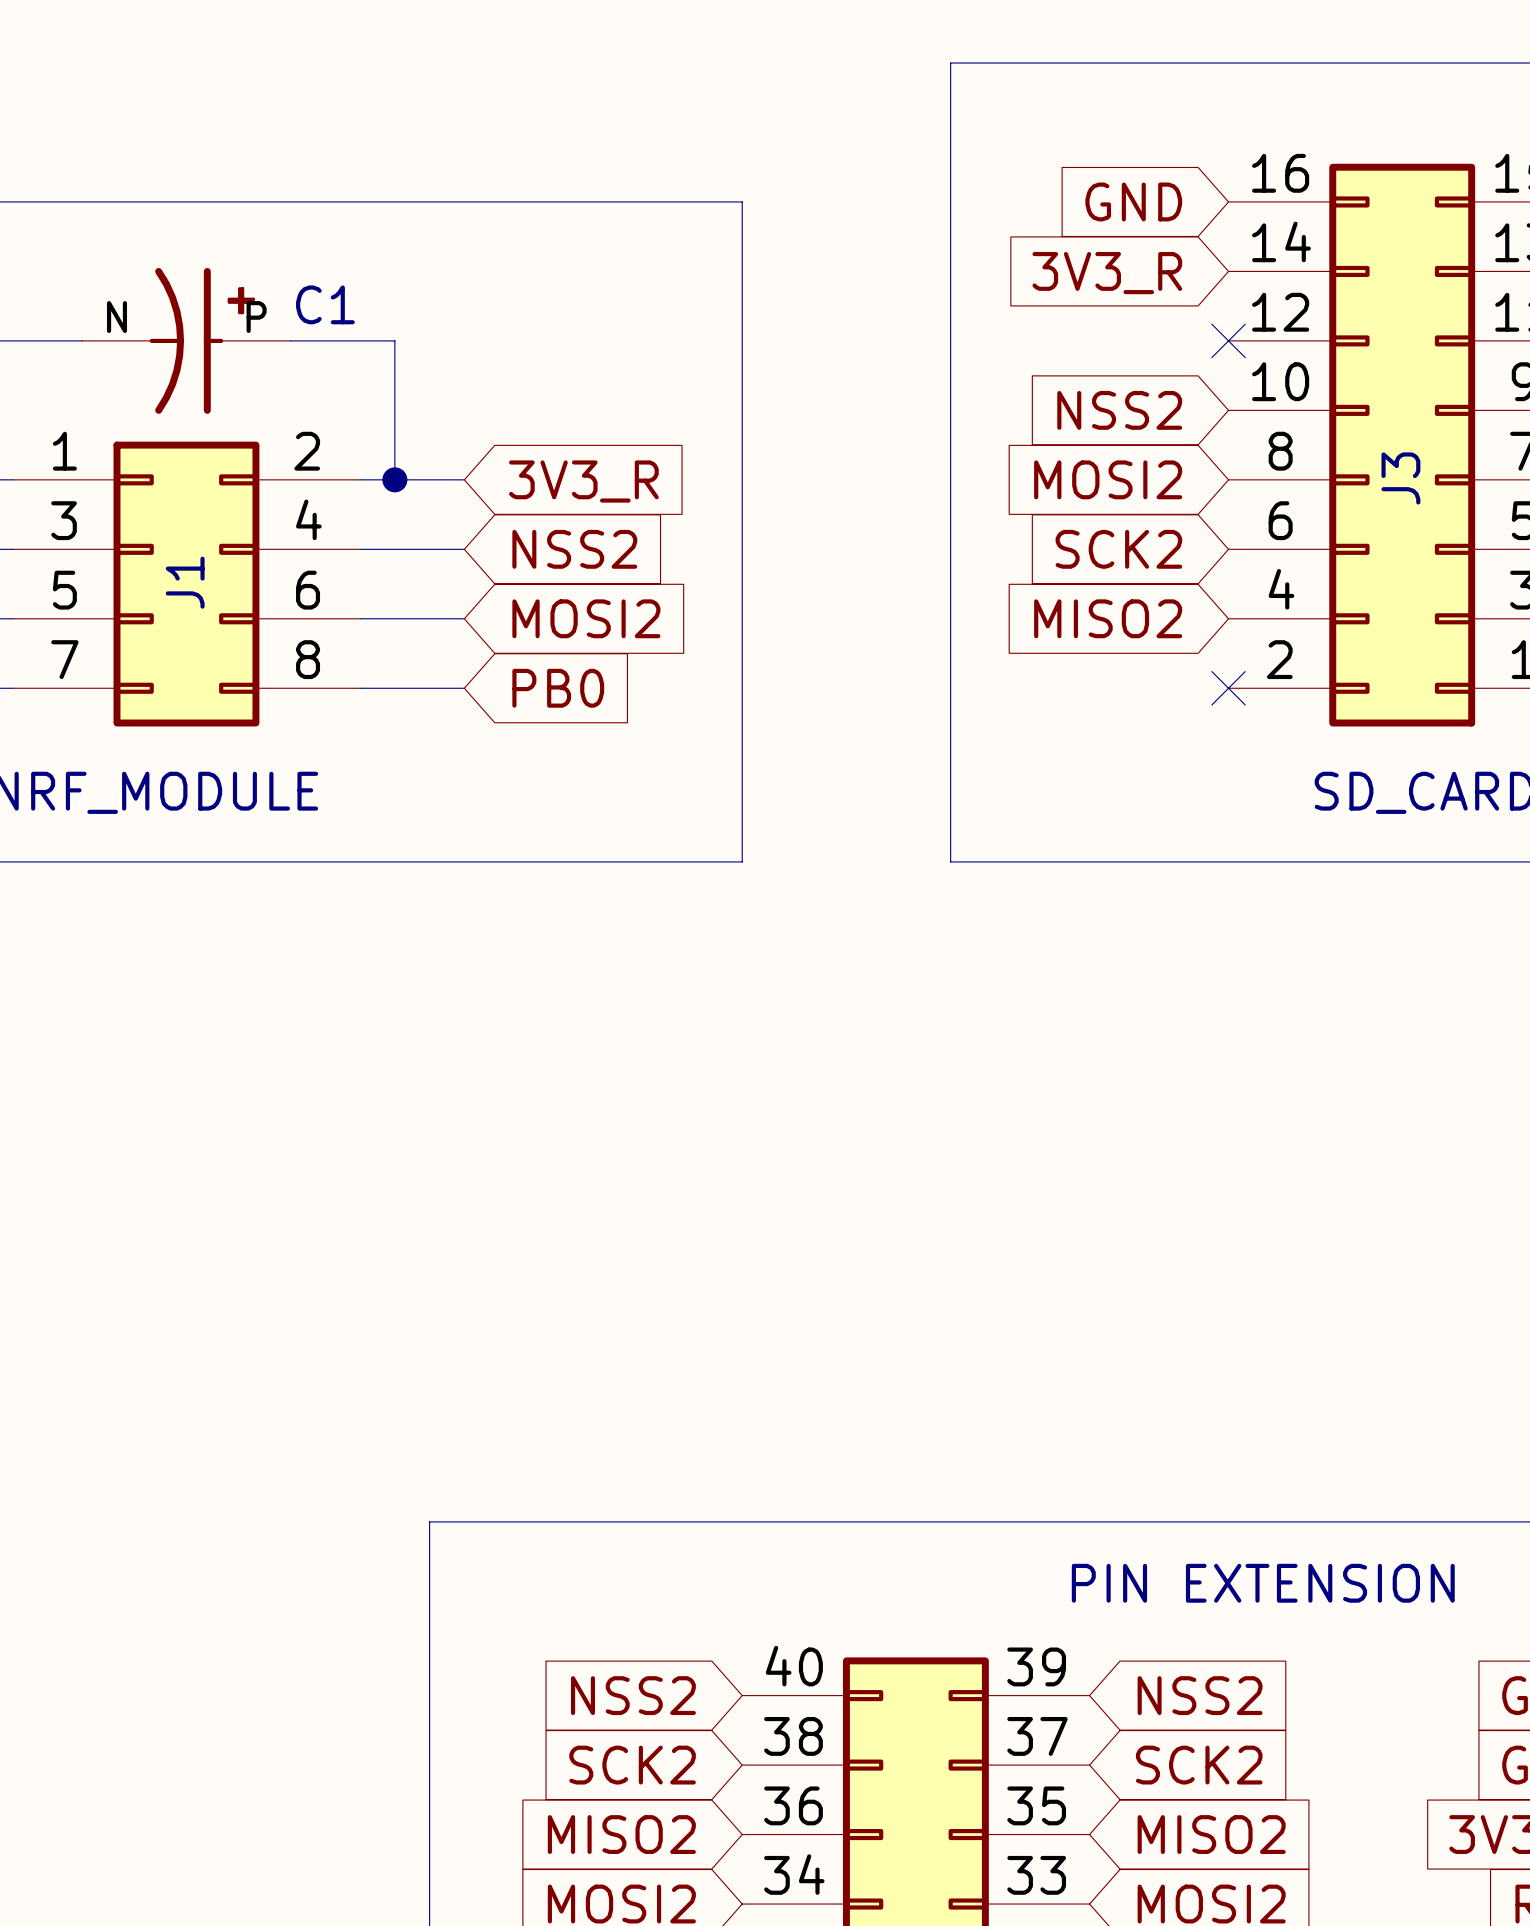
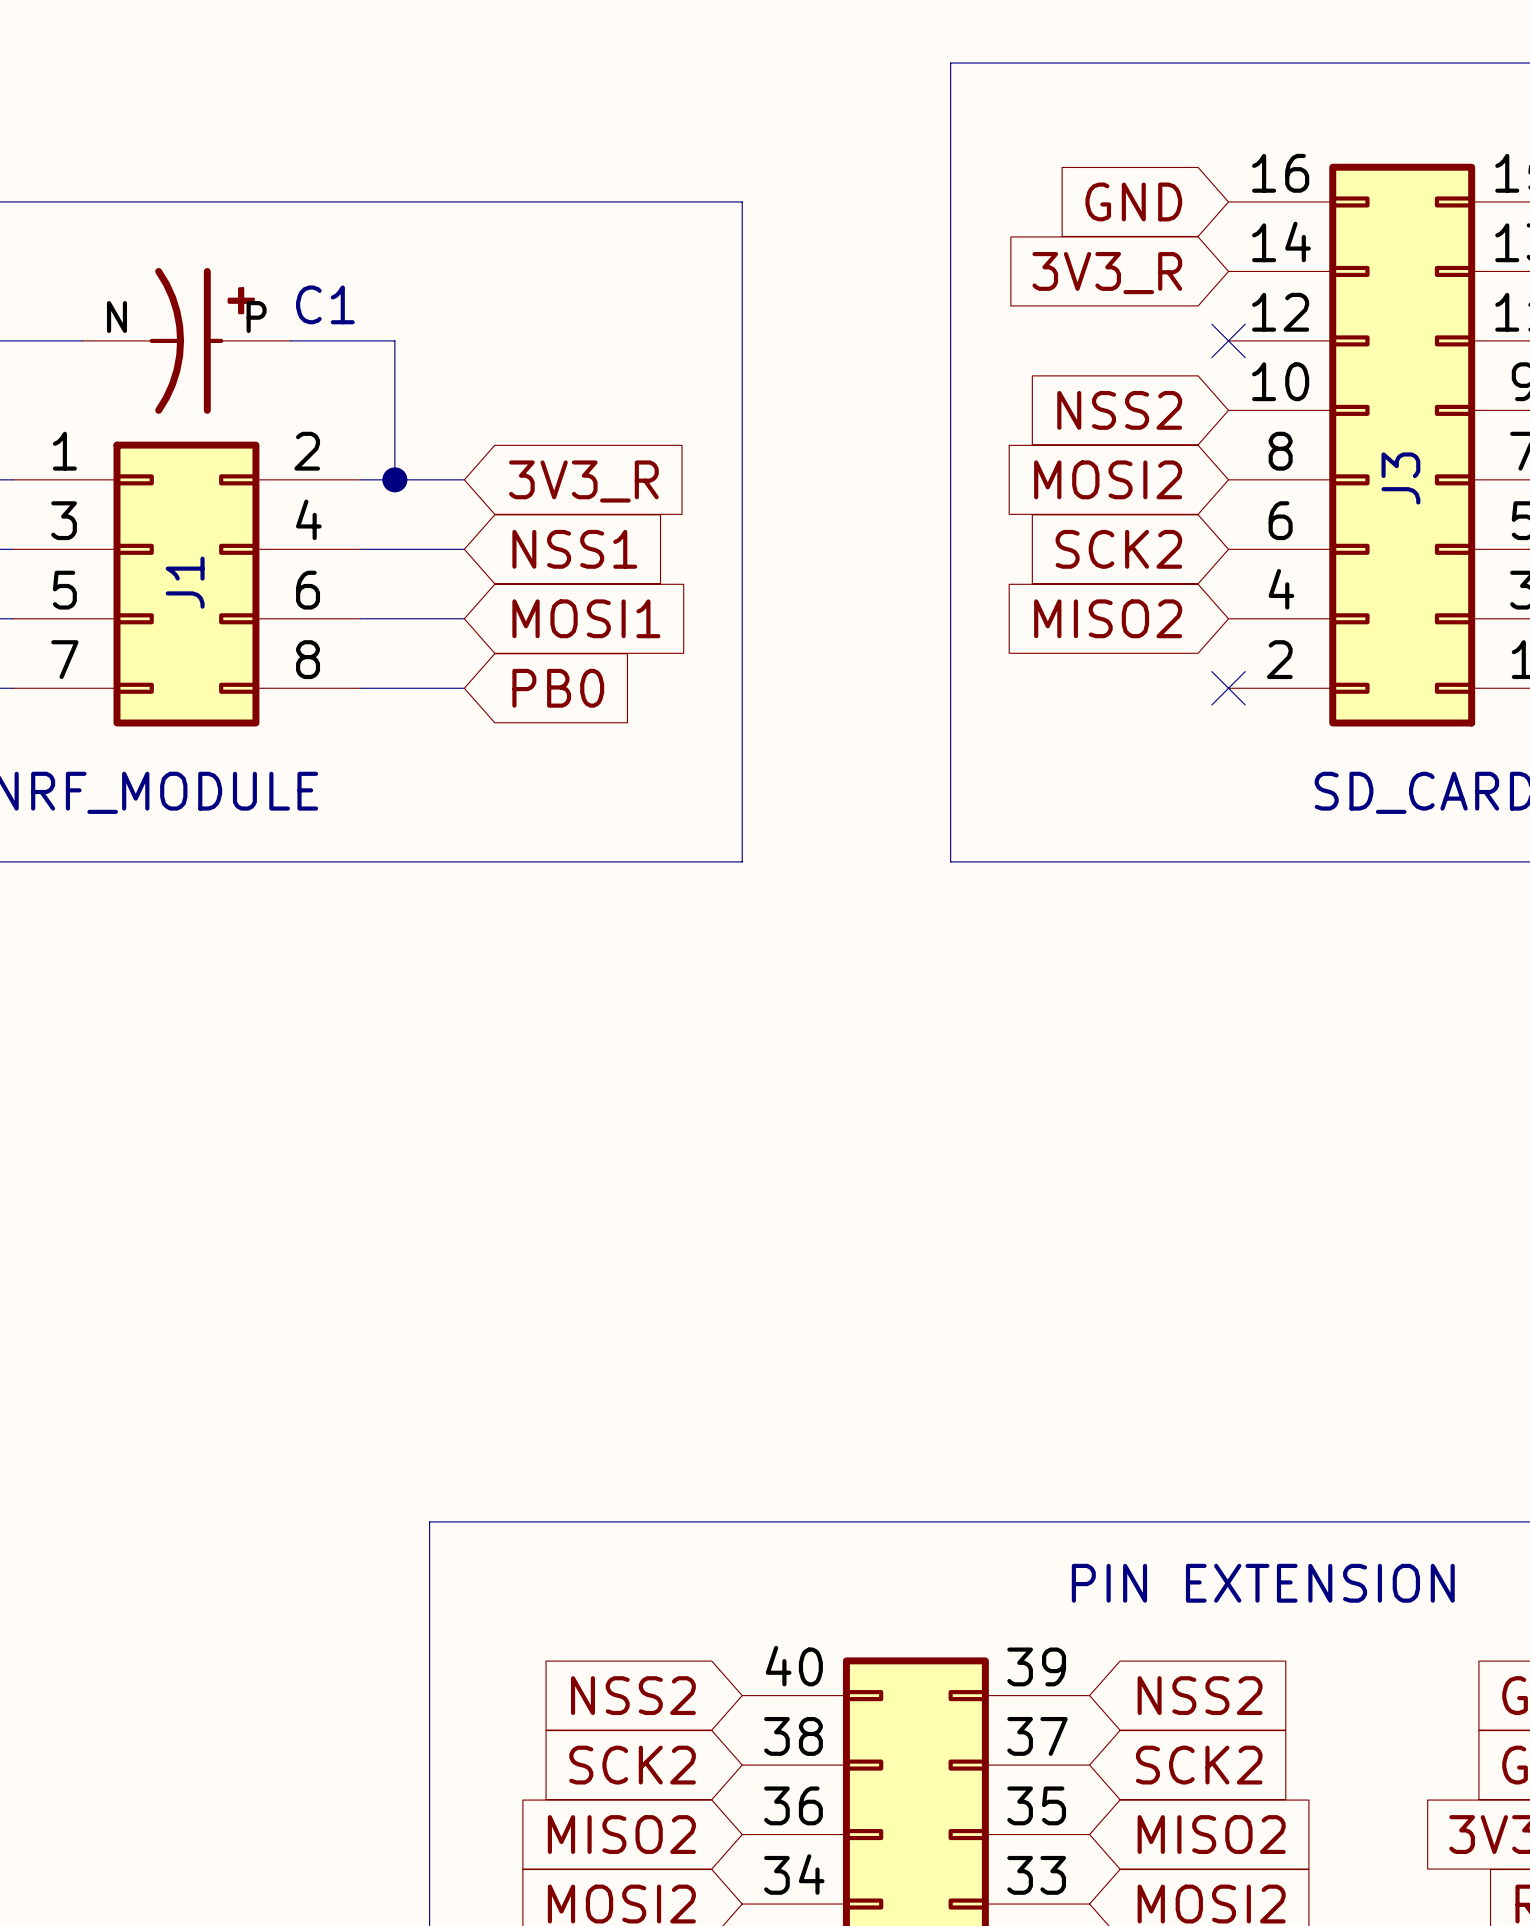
global label: NSS2 (574, 549) -> NSS1 (574, 549)
global label: MOSI2 (586, 618) -> MOSI1 (586, 618)

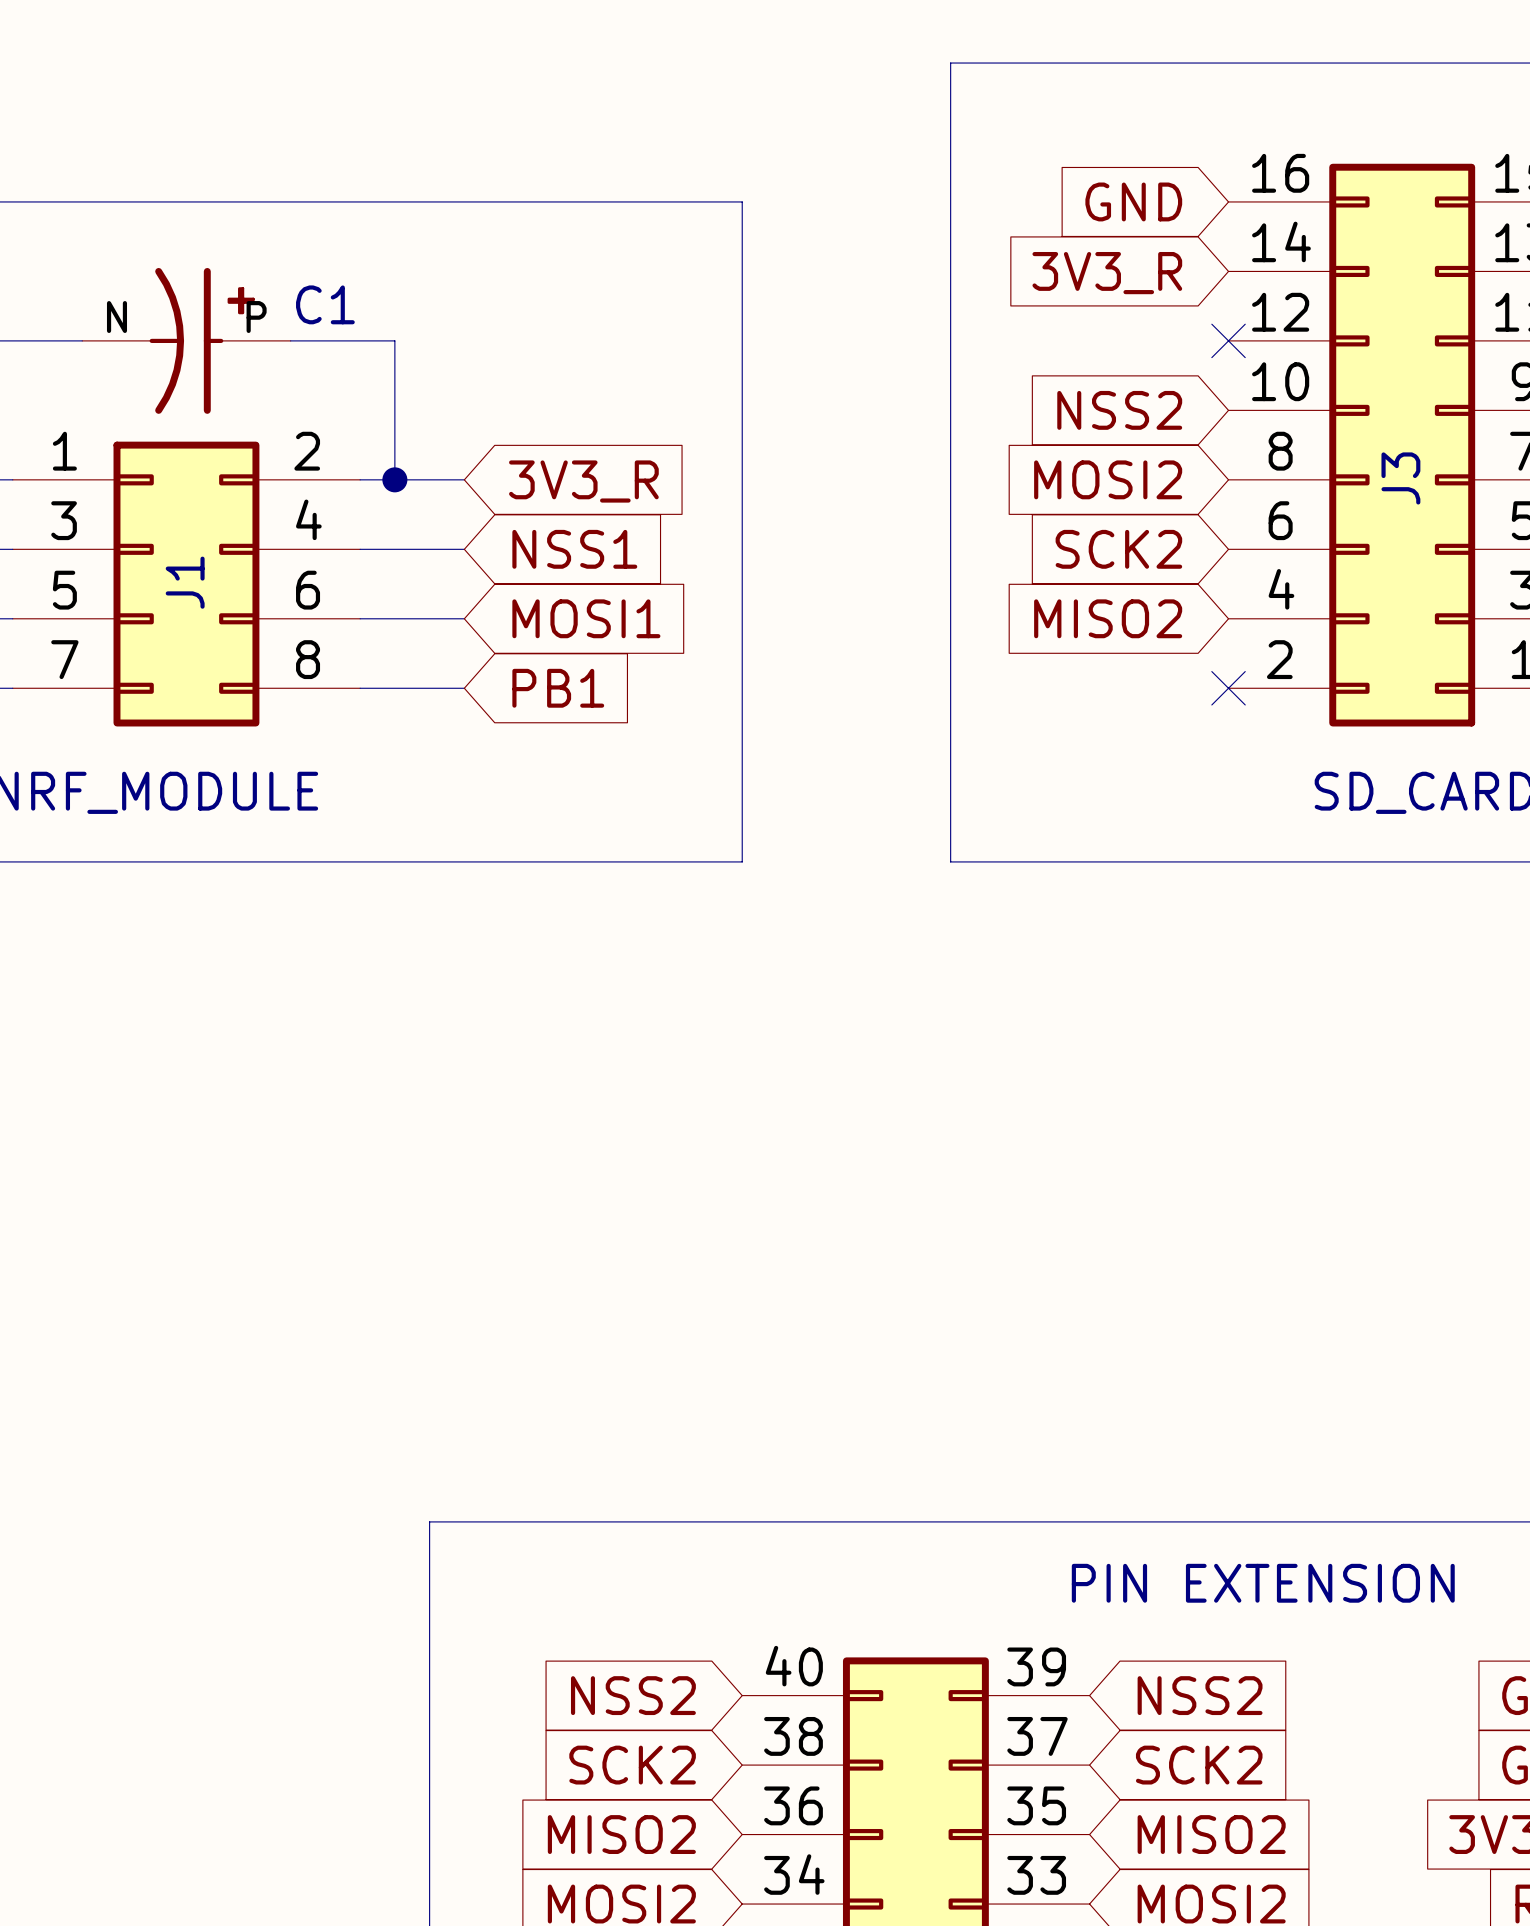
global label: PB0 (558, 688) -> PB1 (558, 688)

